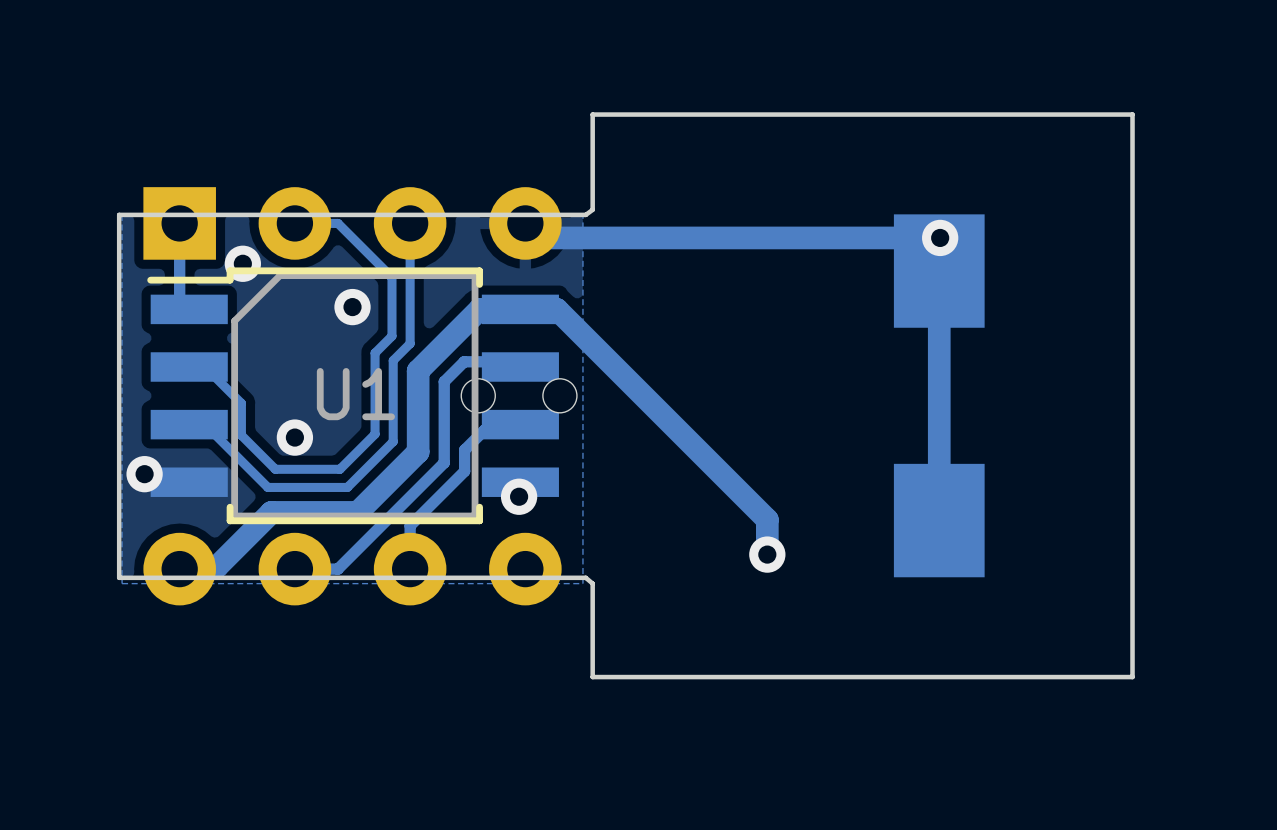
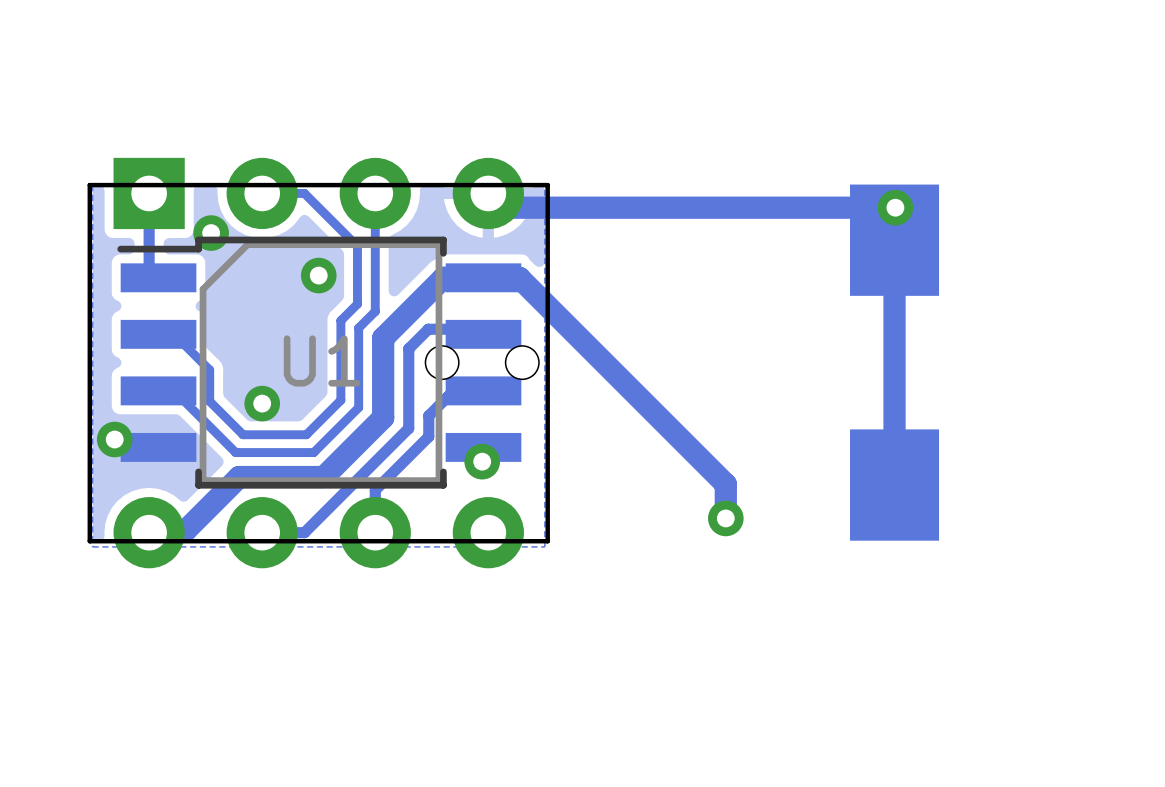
board edge: (585, 214) (592, 209) (592, 114) (1132, 114) (1132, 677) (592, 677) (592, 583) (585, 577) -> (547, 185) (547, 541)

